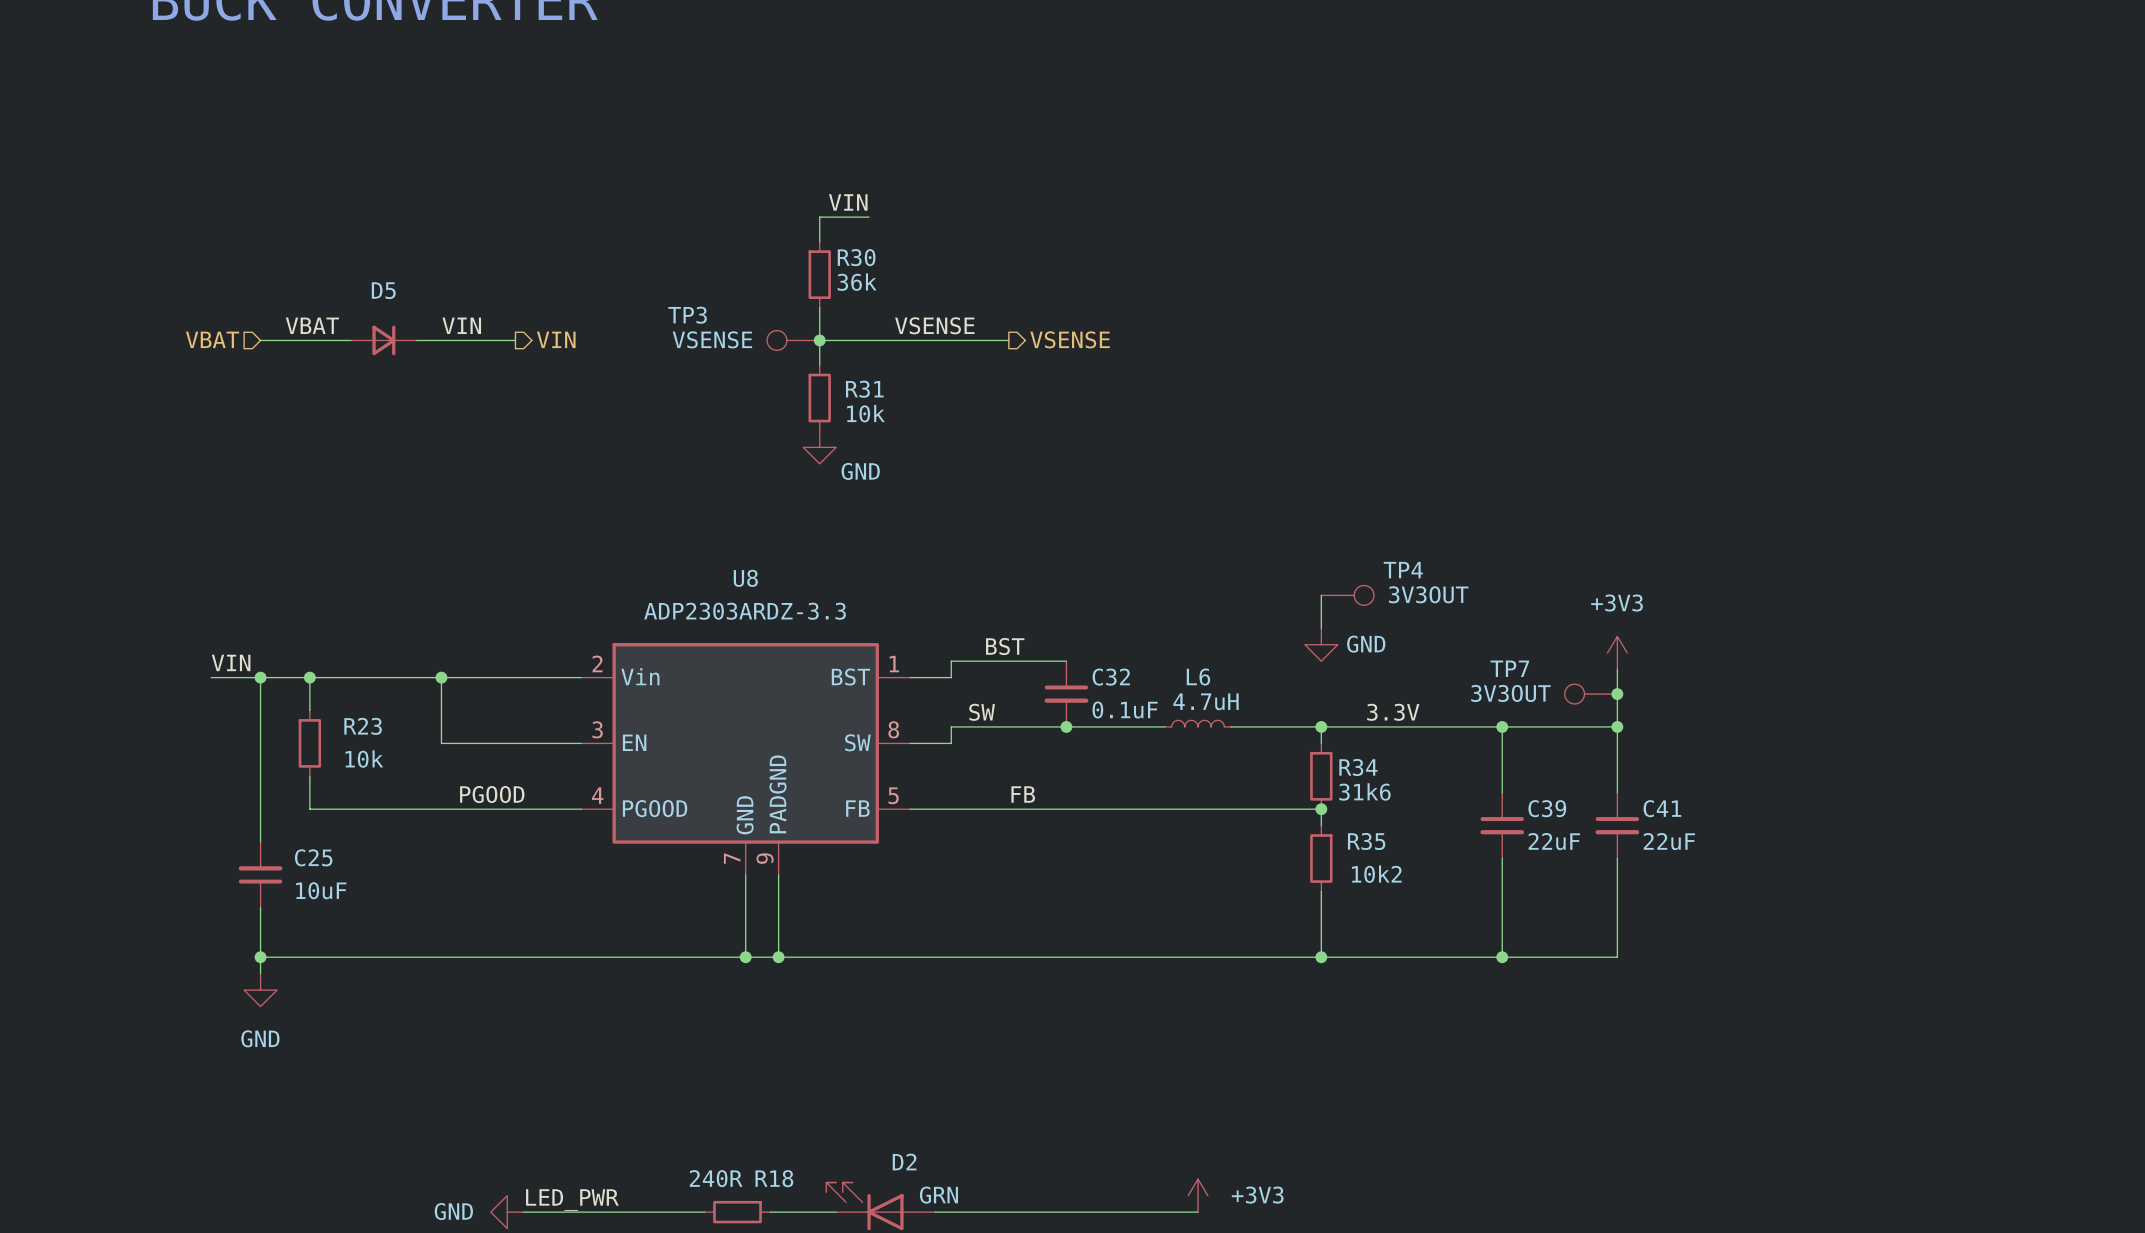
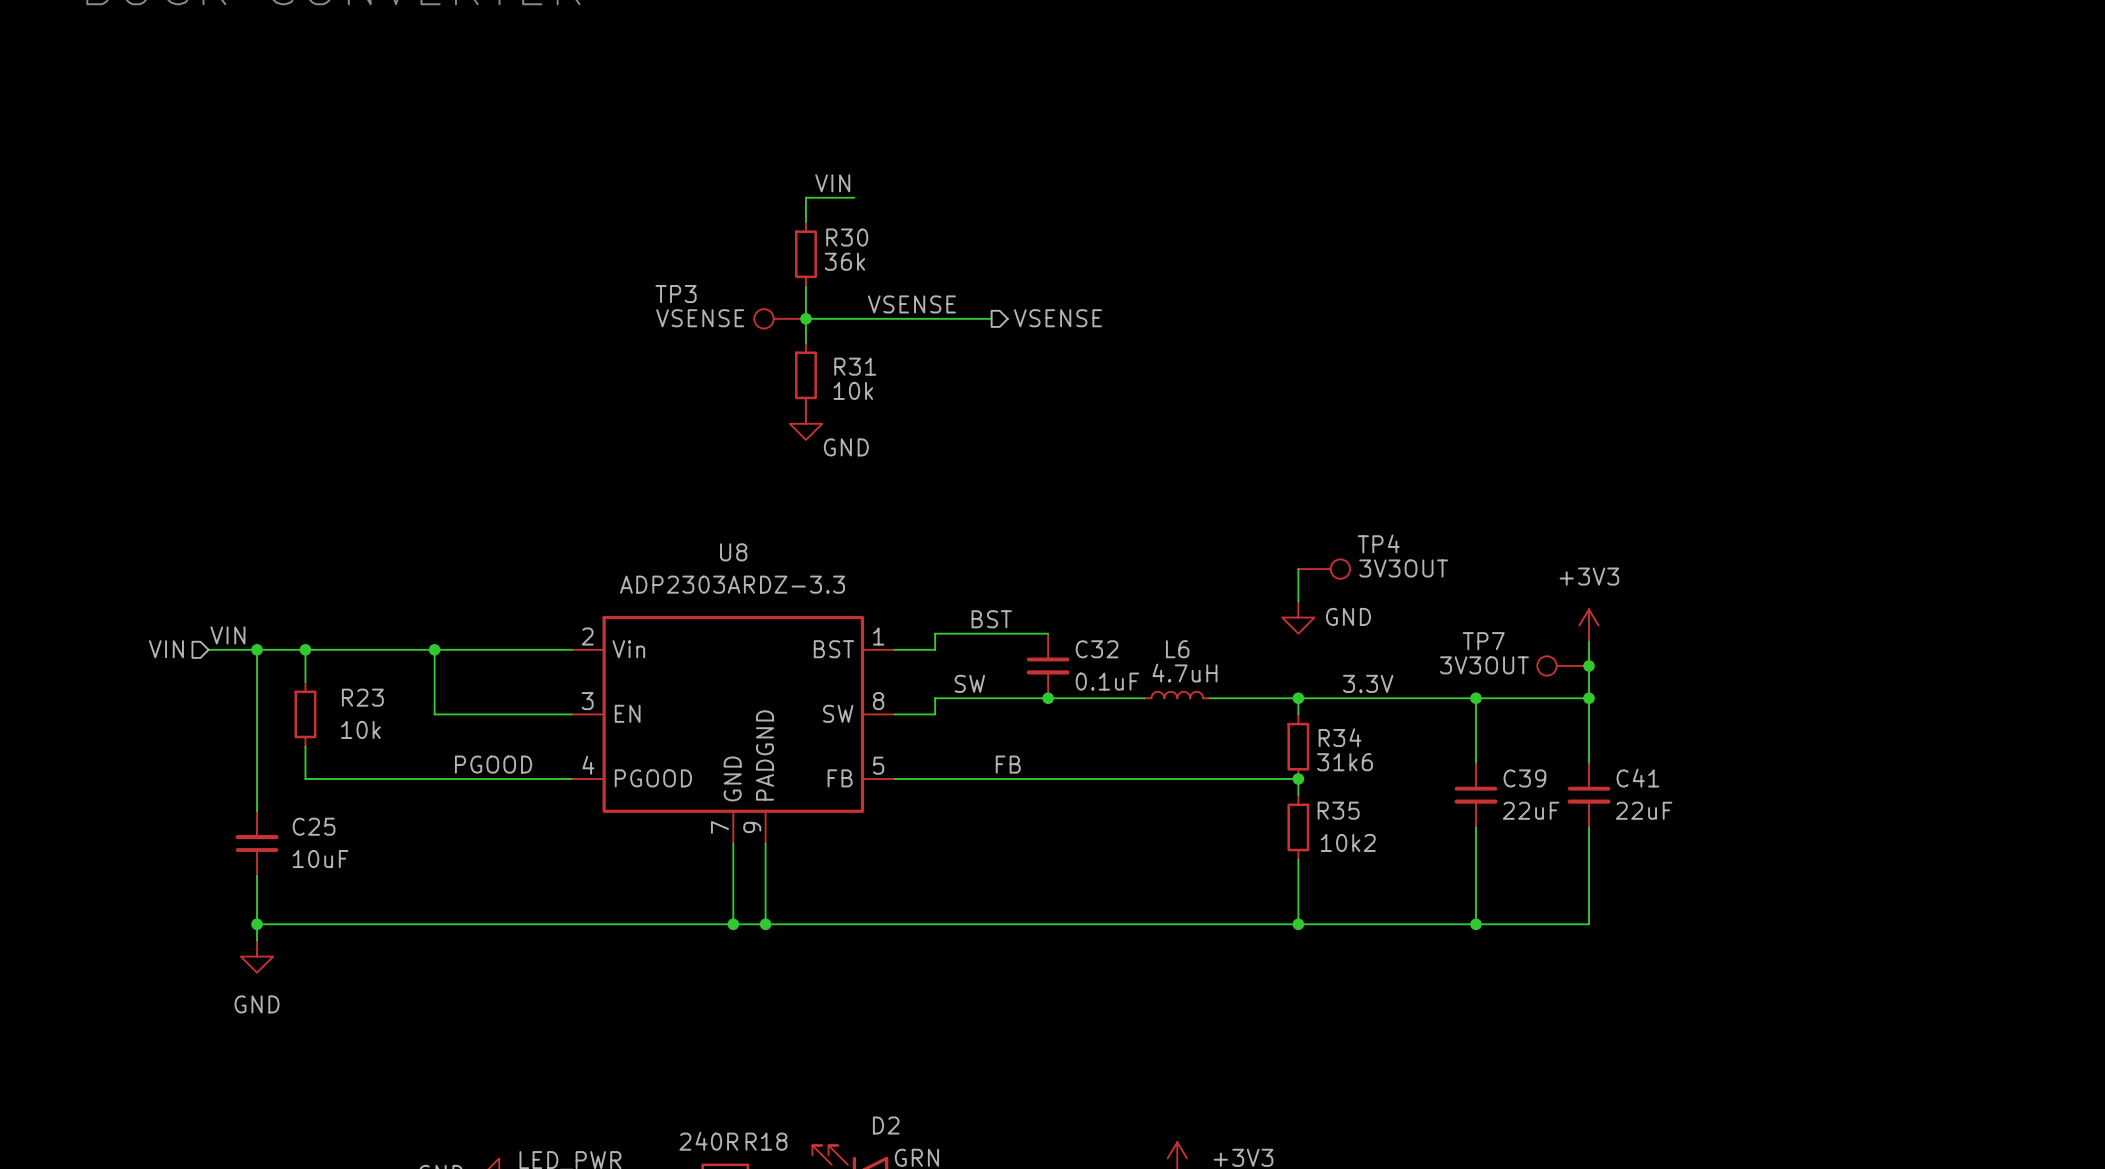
label: VBAT (312, 325) -> none
label: VIN (461, 325) -> none
hierarchical label: VBAT (212, 339) -> none
hierarchical label: VIN (556, 339) -> none
wire: (260, 340) (351, 340) -> none
D5: (383, 340) -> none
wire: (416, 340) (515, 340) -> none
hierarchical label: none -> VIN (166, 649)

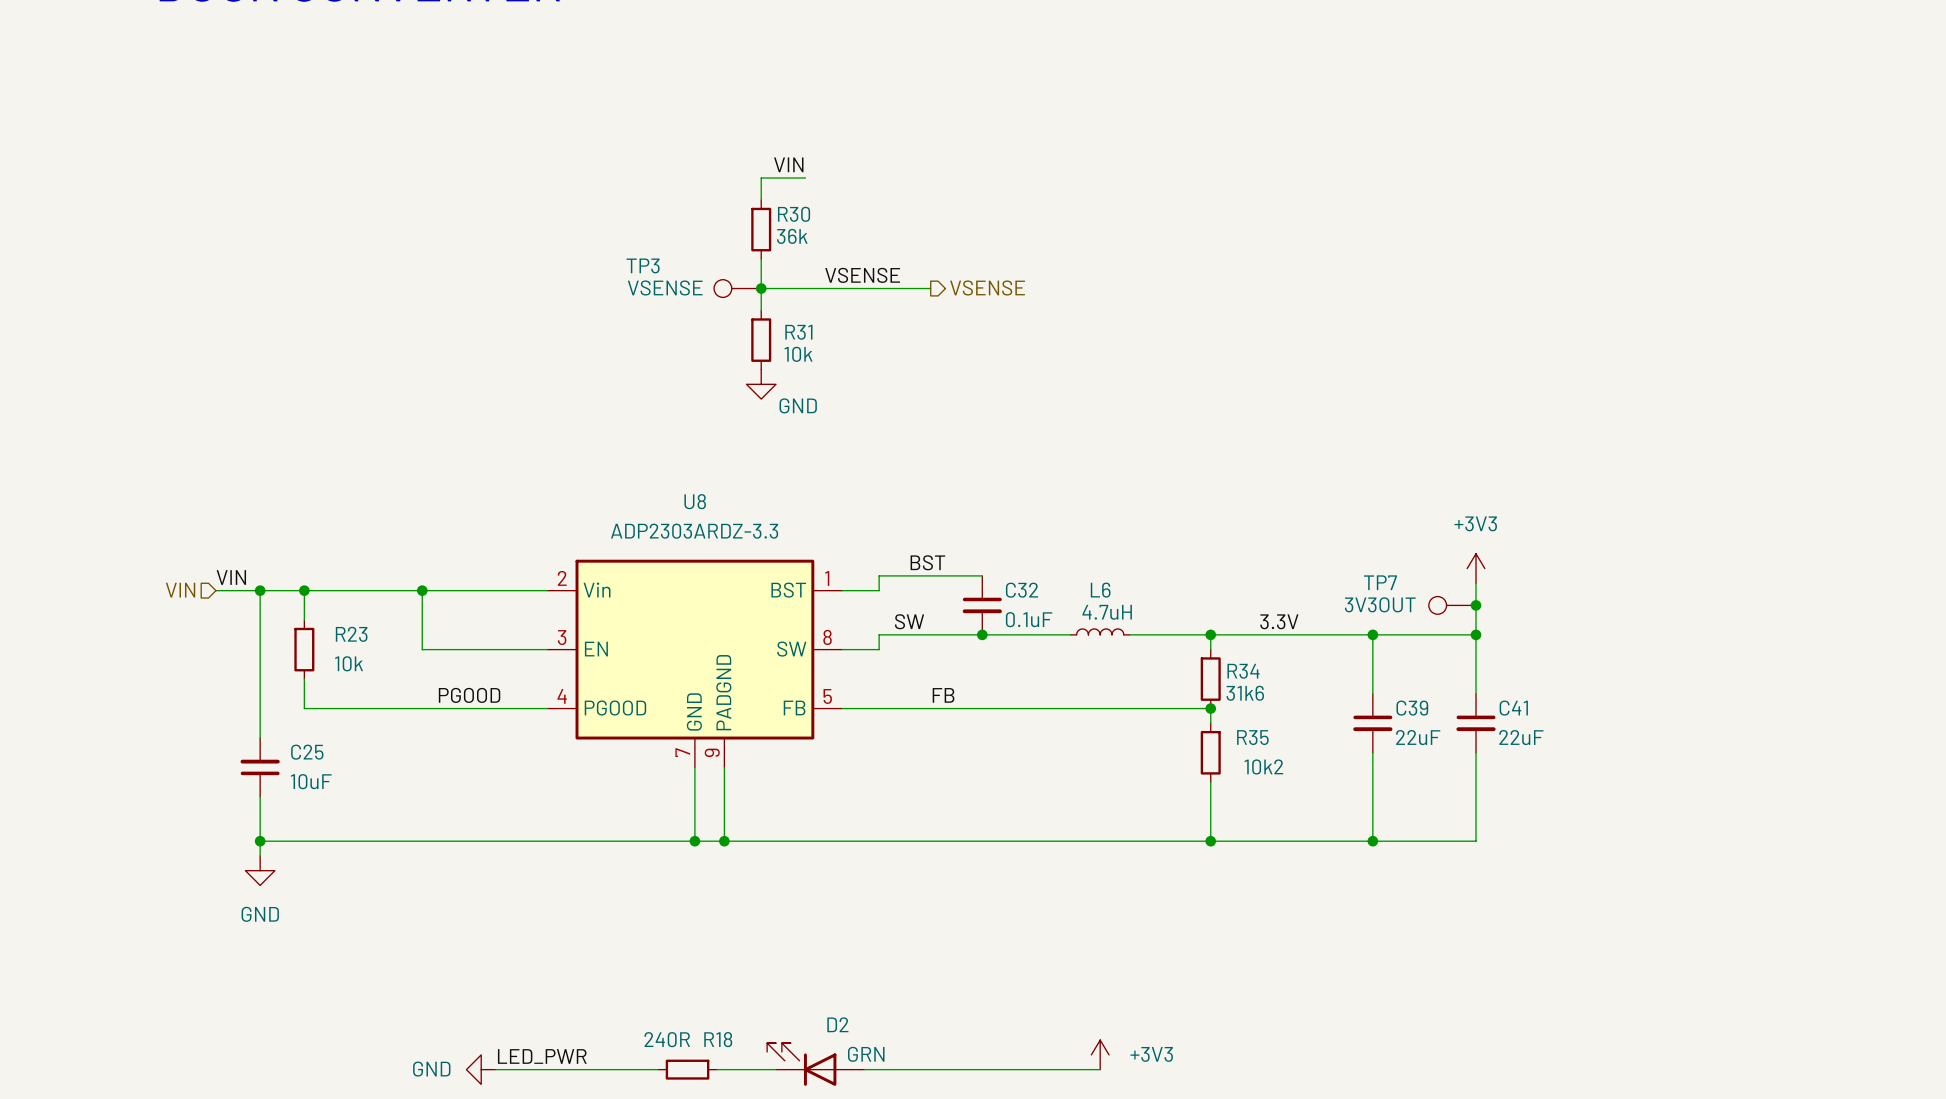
wire: (1298, 569) (1298, 601) -> none
TP4: 3V3OUT (1324, 569) -> none
power symbol: GND (1298, 617) -> none

